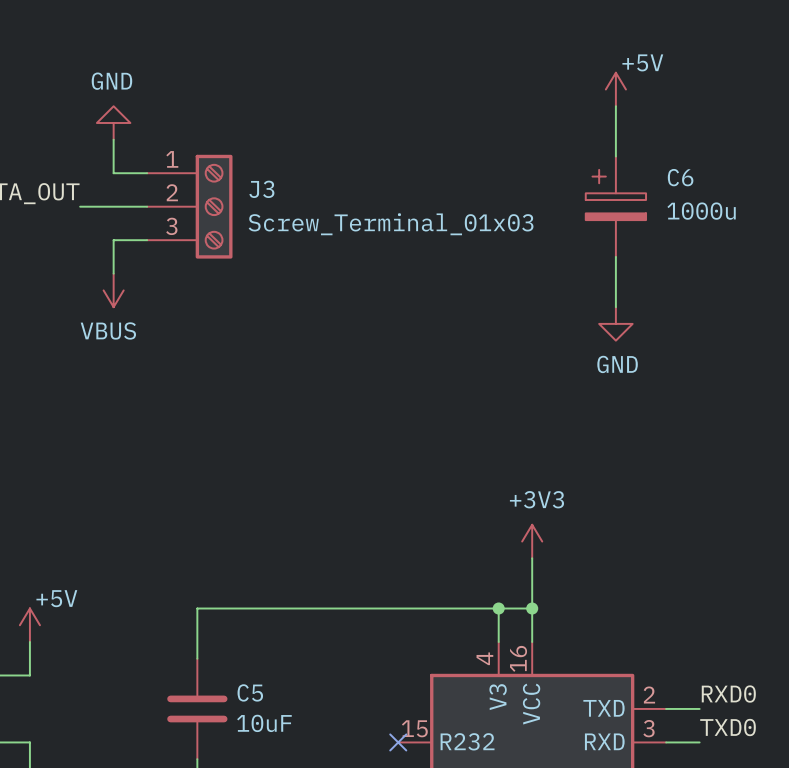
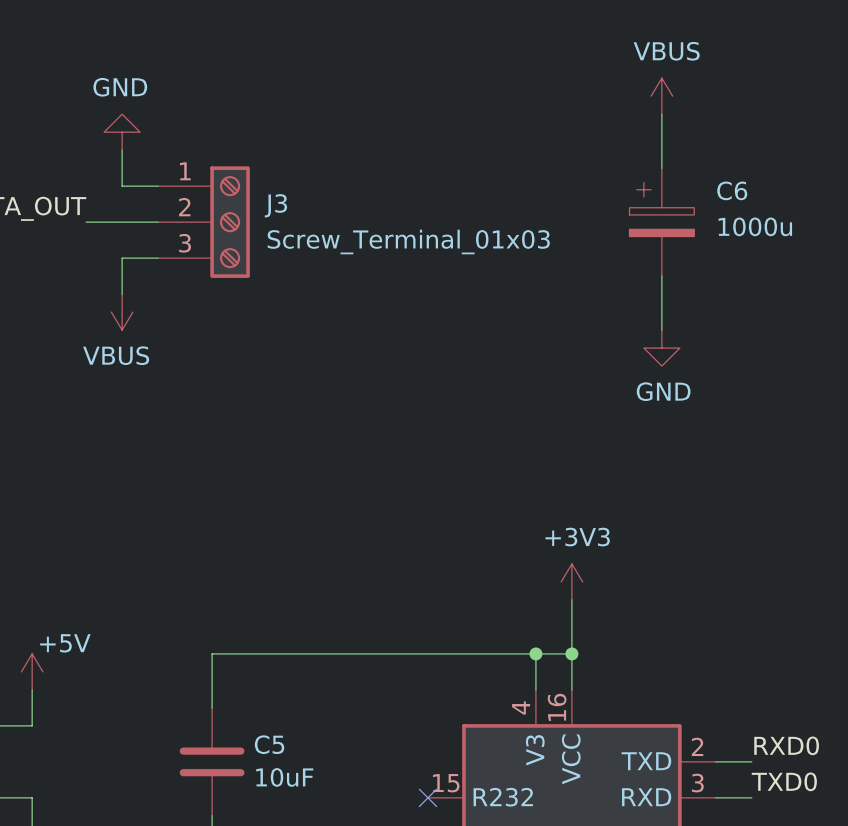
power symbol: +5V (615, 89) -> VBUS (661, 96)

